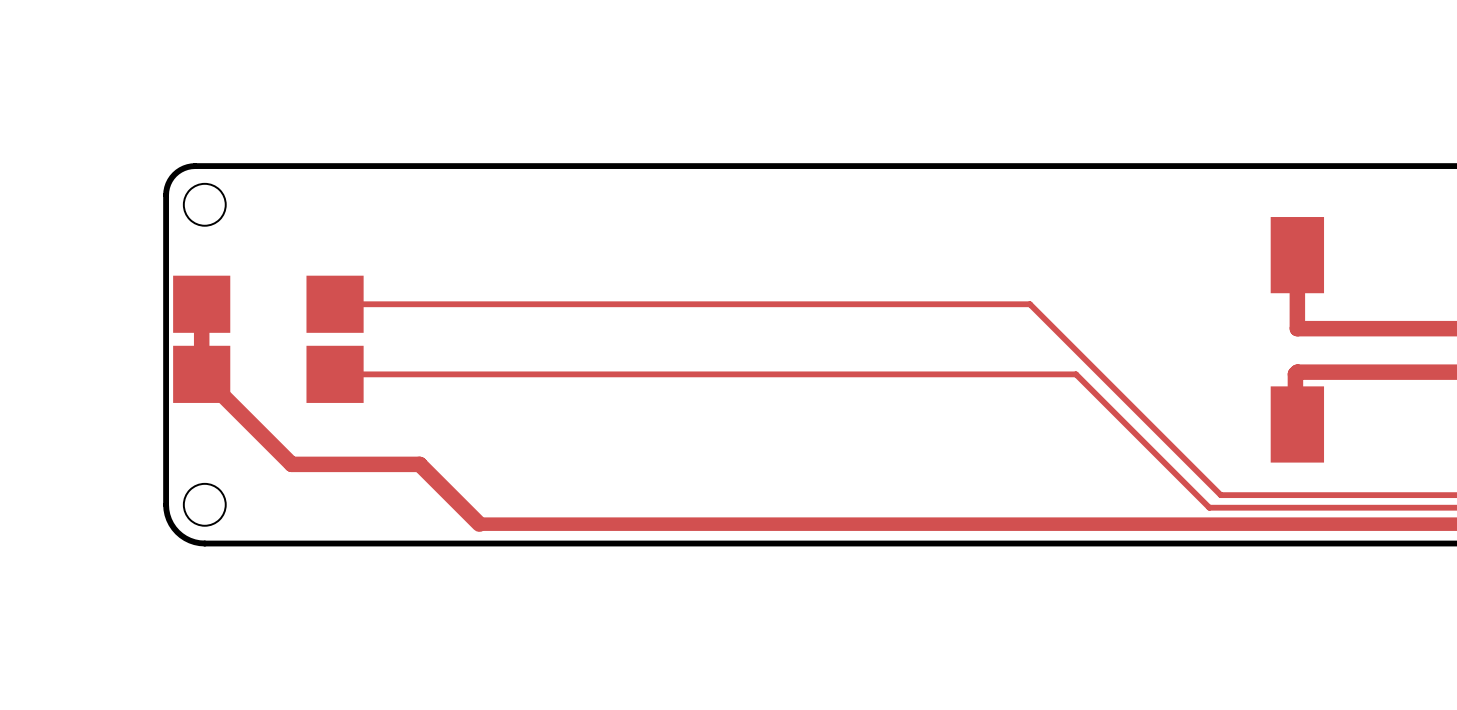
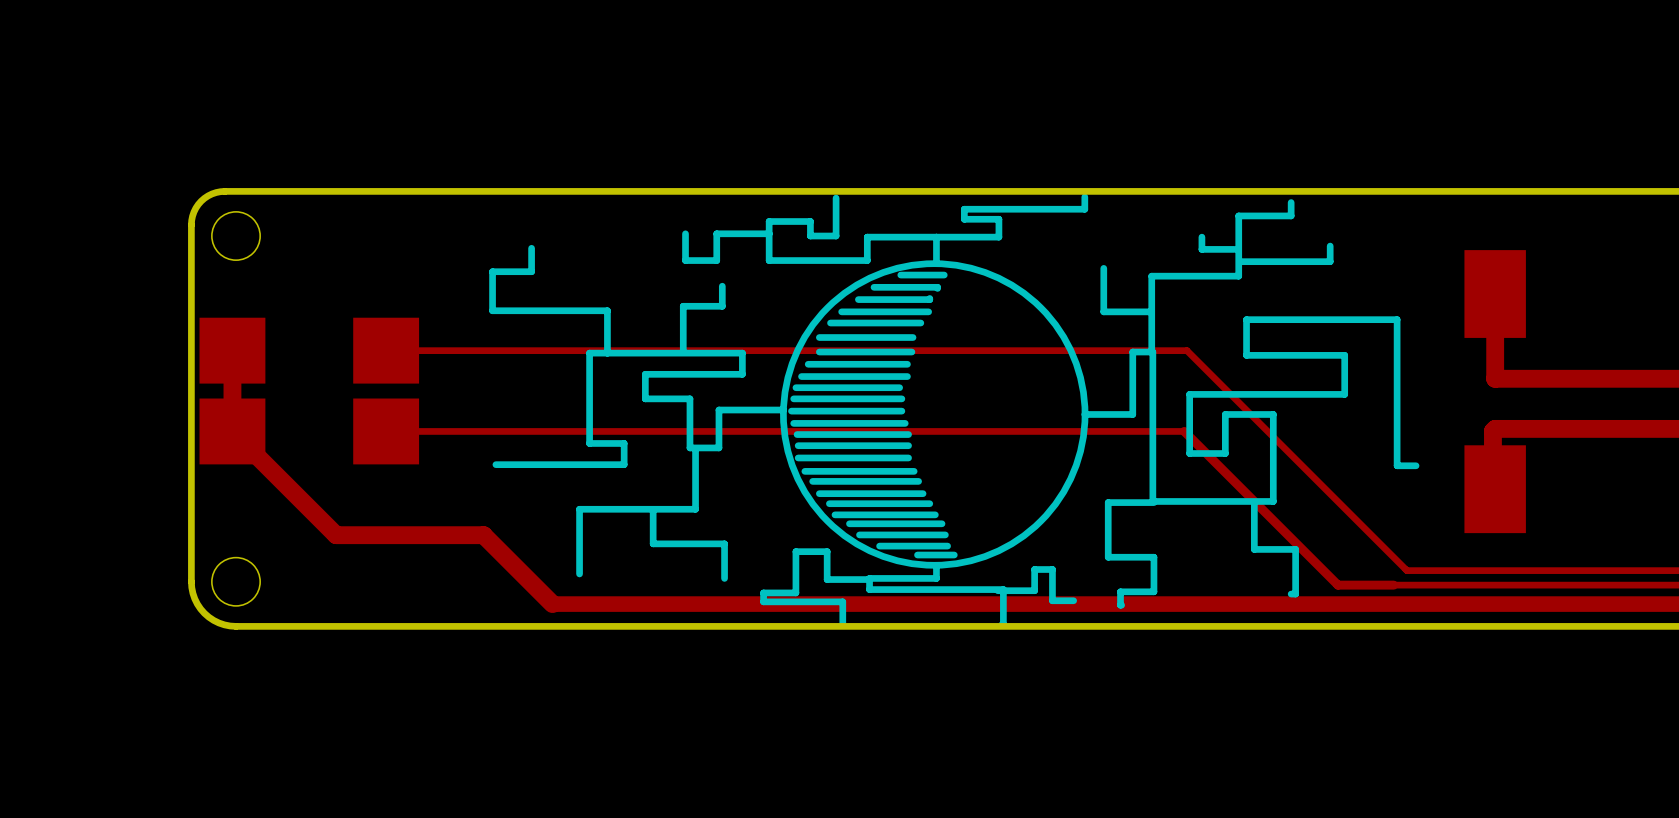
line: none -> (1084, 196) (1084, 209) (964, 209) (964, 219) (998, 219) (998, 237) (867, 237) (867, 260) (769, 260) (769, 221) (810, 221) (810, 236) (836, 236) (836, 198)
line: none -> (1291, 202) (1291, 215) (1238, 215) (1238, 276) (1151, 276) (1151, 352)
line: none -> (769, 233) (716, 233) (716, 260) (685, 260) (685, 233)
line: none -> (936, 237) (936, 262)
line: none -> (1201, 237) (1201, 249) (1234, 249)
line: none -> (1330, 246) (1330, 261) (1242, 261)
line: none -> (531, 248) (531, 271) (492, 271) (492, 310) (607, 310) (607, 353)
drawing: none -> [780, 260, 1089, 569]
line: none -> (1103, 268) (1103, 311) (1149, 311)
line: none -> (944, 275) (900, 275)
line: none -> (722, 286) (722, 306) (683, 306) (683, 349)
line: none -> (874, 287) (937, 288)
line: none -> (929, 298) (858, 299)
line: none -> (928, 311) (841, 311)
line: none -> (920, 323) (830, 323)
line: none -> (913, 337) (819, 337)
line: none -> (911, 352) (819, 352)
line: none -> (907, 364) (808, 364)
line: none -> (907, 376) (801, 376)
line: none -> (899, 387) (795, 387)
line: none -> (901, 398) (793, 398)
line: none -> (783, 410) (718, 410) (718, 447) (689, 447) (689, 398) (645, 398) (645, 374) (742, 374) (742, 353) (589, 353) (589, 443) (624, 443) (624, 464) (495, 464)
line: none -> (901, 411) (791, 411)
line: none -> (1084, 414) (1132, 414) (1132, 352) (1152, 352) (1152, 501) (1273, 501) (1273, 414) (1225, 414) (1225, 453) (1189, 453) (1189, 394) (1344, 394) (1344, 355) (1246, 355) (1246, 319) (1397, 319) (1397, 465) (1416, 465)
line: none -> (905, 423) (793, 423)
top track: (1027, 374) (1076, 374) (1209, 507) -> (1184, 431) (1338, 585) (1393, 585)
line: none -> (908, 434) (797, 434)
line: none -> (908, 445) (798, 445)
line: none -> (695, 449) (695, 509) (579, 509) (579, 573)
line: none -> (908, 457) (798, 457)
line: none -> (914, 471) (804, 471)
line: none -> (918, 481) (812, 481)
line: none -> (923, 493) (819, 493)
line: none -> (1153, 502) (1108, 502) (1108, 557) (1153, 557) (1153, 591) (1120, 591) (1121, 605)
line: none -> (1254, 502) (1254, 549) (1295, 549) (1295, 594) (1291, 594)
line: none -> (929, 503) (829, 503)
line: none -> (653, 510) (653, 543) (724, 543) (724, 578)
line: none -> (935, 514) (834, 514)
line: none -> (942, 523) (849, 523)
line: none -> (945, 534) (859, 534)
line: none -> (947, 546) (879, 546)
line: none -> (954, 555) (917, 555)
line: none -> (936, 566) (936, 578) (869, 578) (869, 589) (1003, 589) (1002, 624)
line: none -> (866, 579) (827, 579) (827, 551) (795, 551) (795, 592) (763, 592) (763, 601) (842, 601) (842, 625)
line: none -> (997, 590) (1034, 590) (1034, 569) (1052, 569) (1052, 600) (1073, 600)

